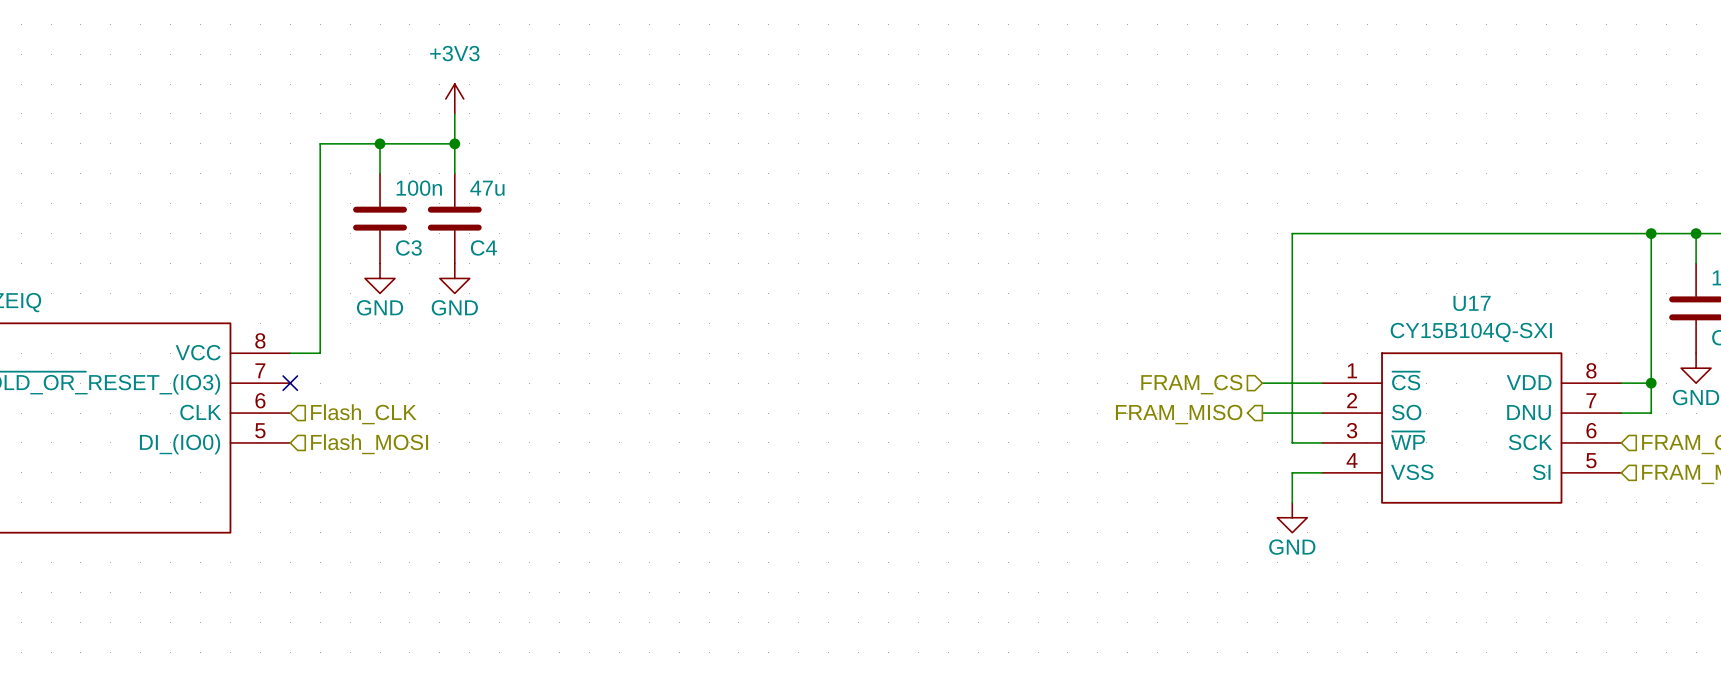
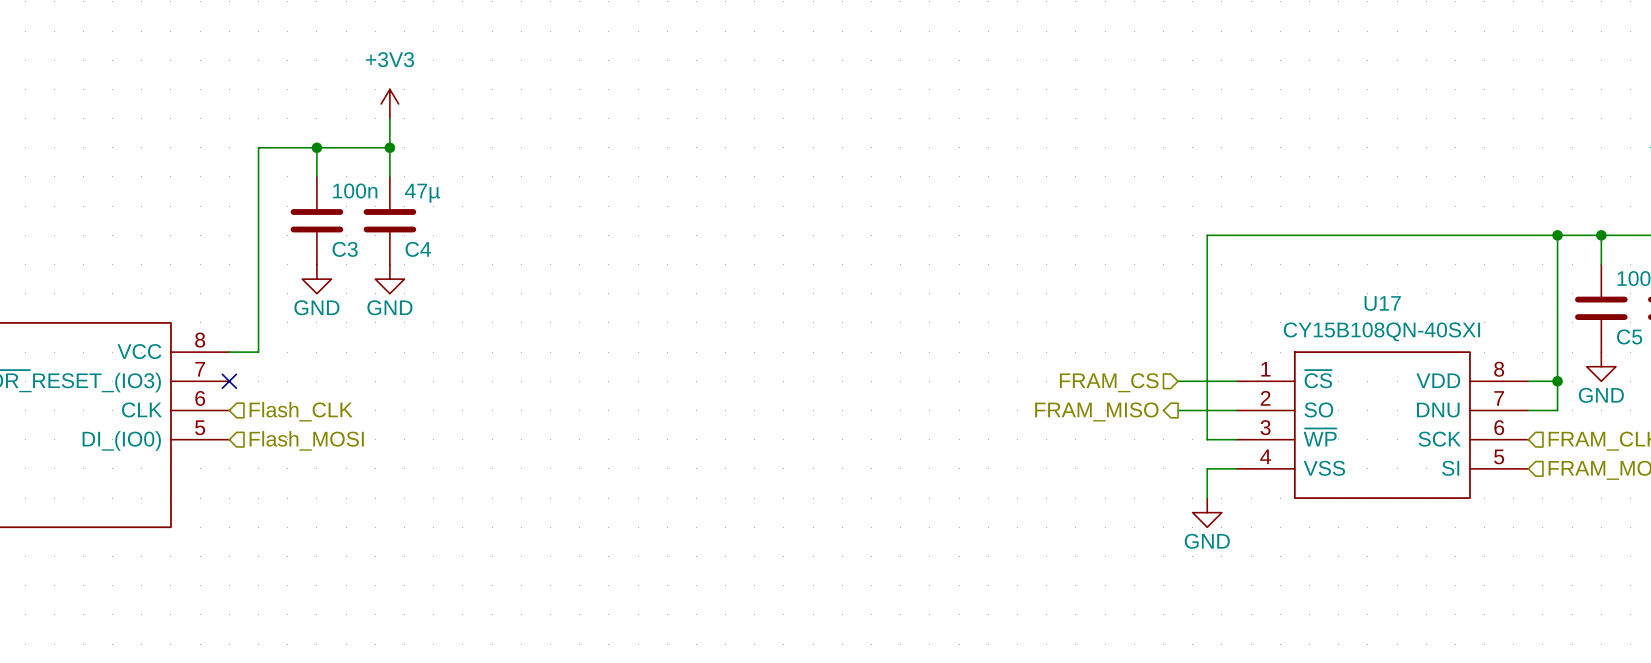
C4 value: 47u (487, 188) -> 47µ (422, 193)
U17 value: CY15B104Q-SXI (1471, 332) -> CY15B108QN-40SXI (1381, 331)

